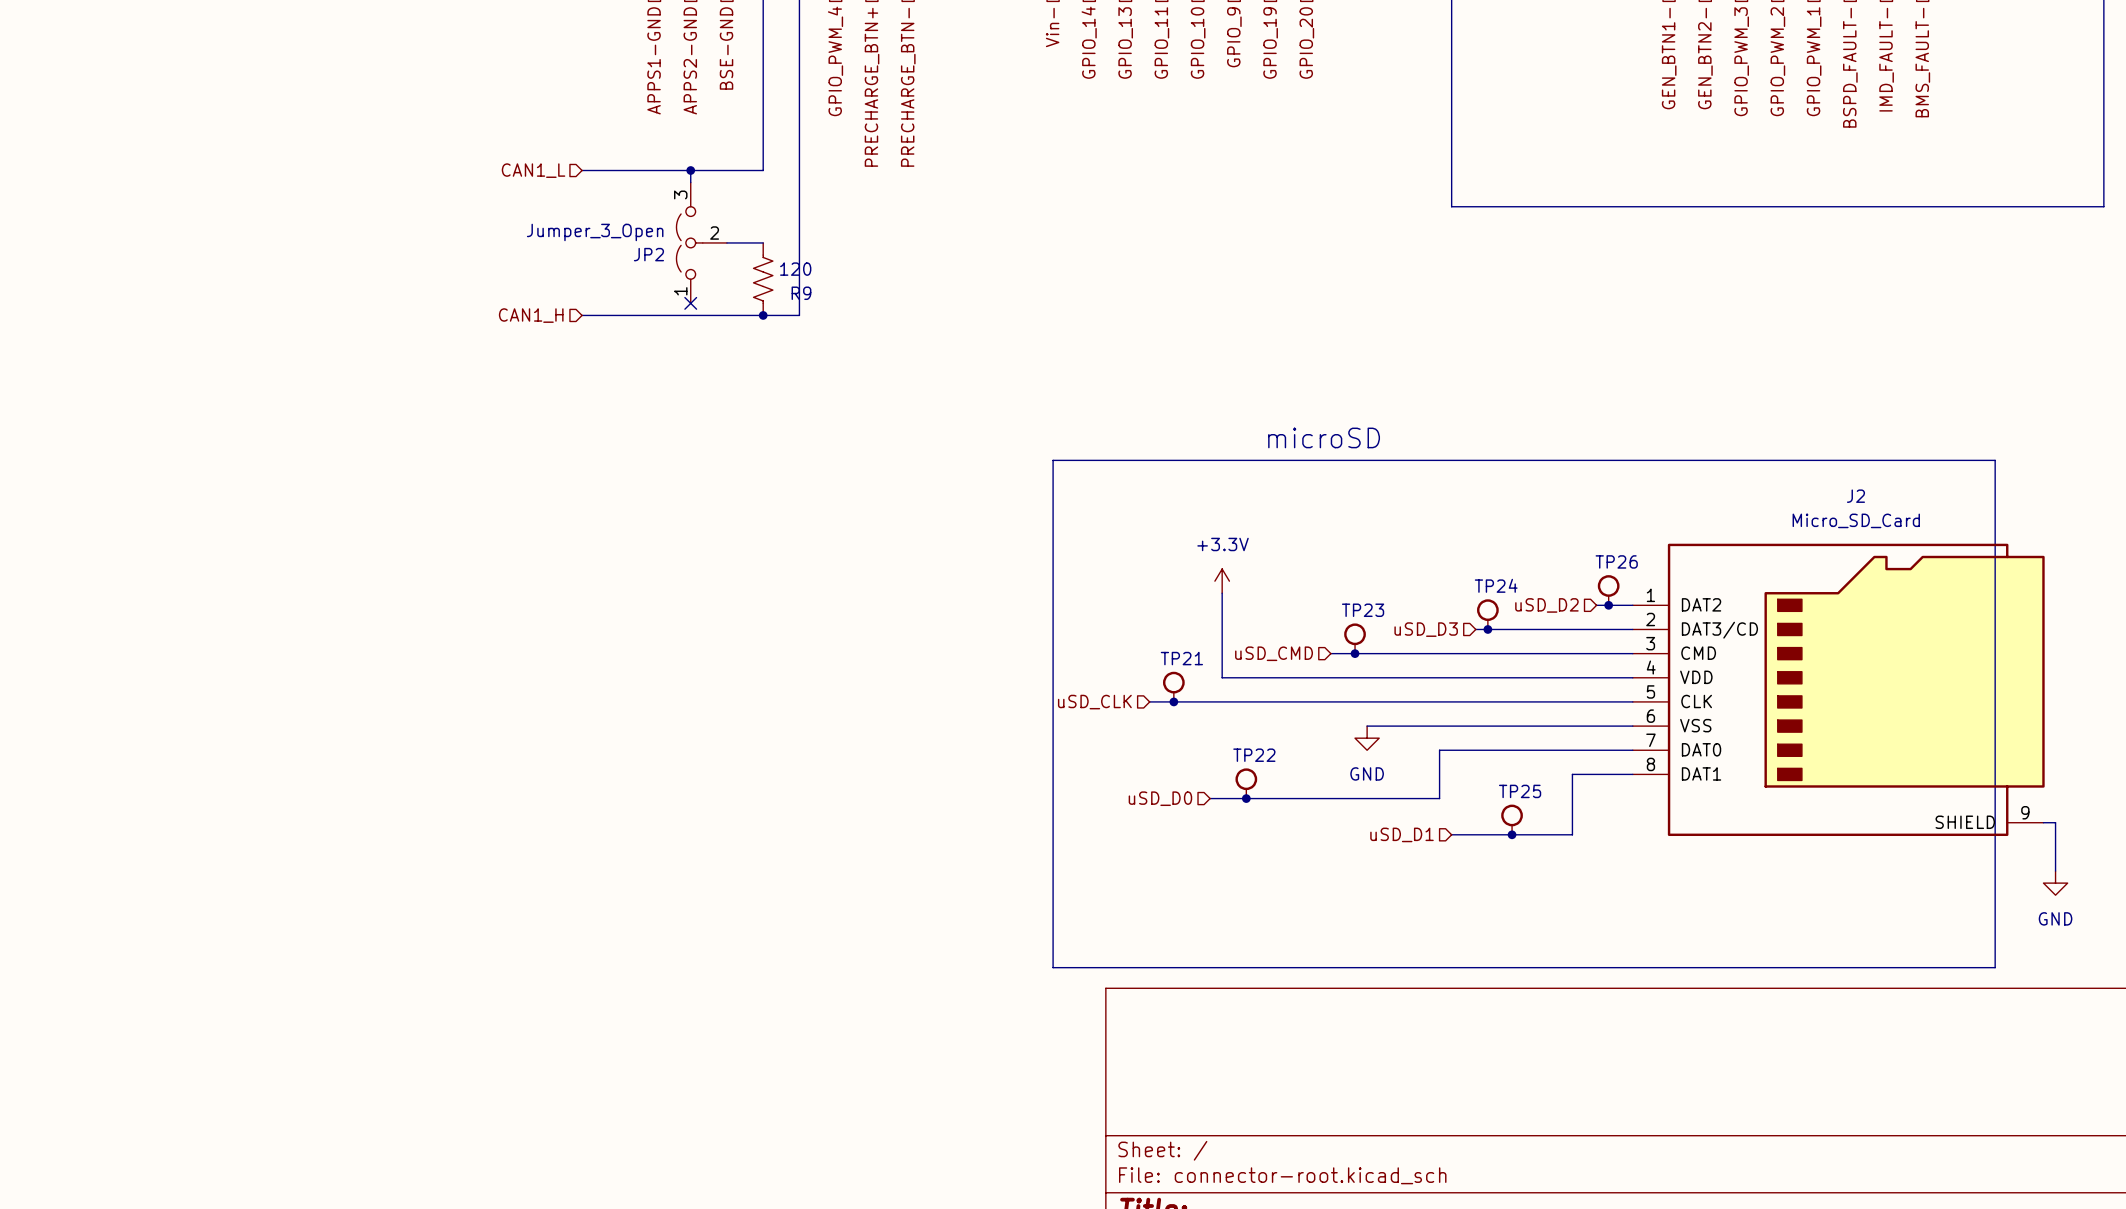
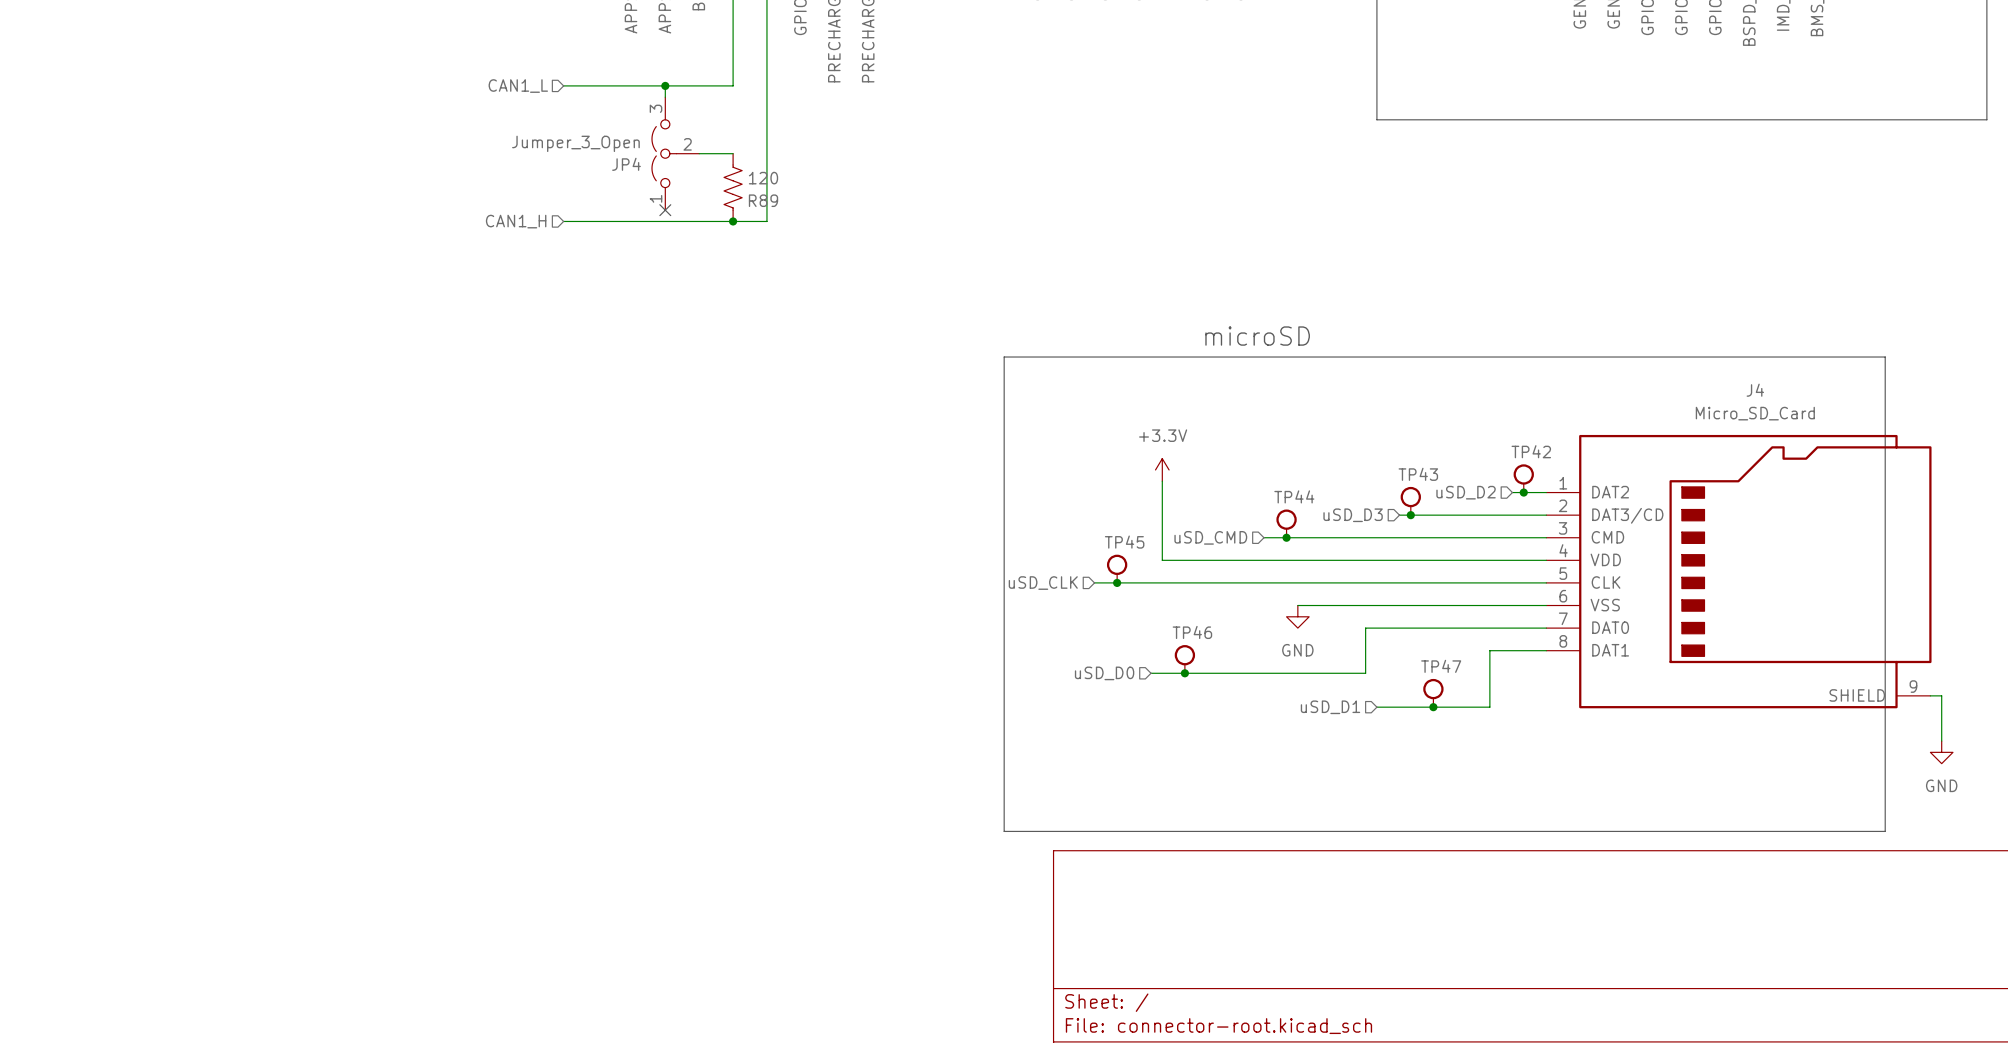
JP2 name: JP2 (648, 254) -> JP4 (626, 164)
R9 name: R9 (801, 293) -> R89 (763, 200)
J2 name: J2 (1855, 496) -> J4 (1755, 390)
TP26 name: TP26 (1616, 561) -> TP42 (1531, 451)
TP24 name: TP24 (1496, 585) -> TP43 (1418, 474)
TP23 name: TP23 (1363, 610) -> TP44 (1294, 496)
TP21 name: TP21 (1181, 658) -> TP45 (1124, 542)
TP22 name: TP22 (1254, 755) -> TP46 (1192, 632)
TP25 name: TP25 (1520, 791) -> TP47 (1441, 666)

